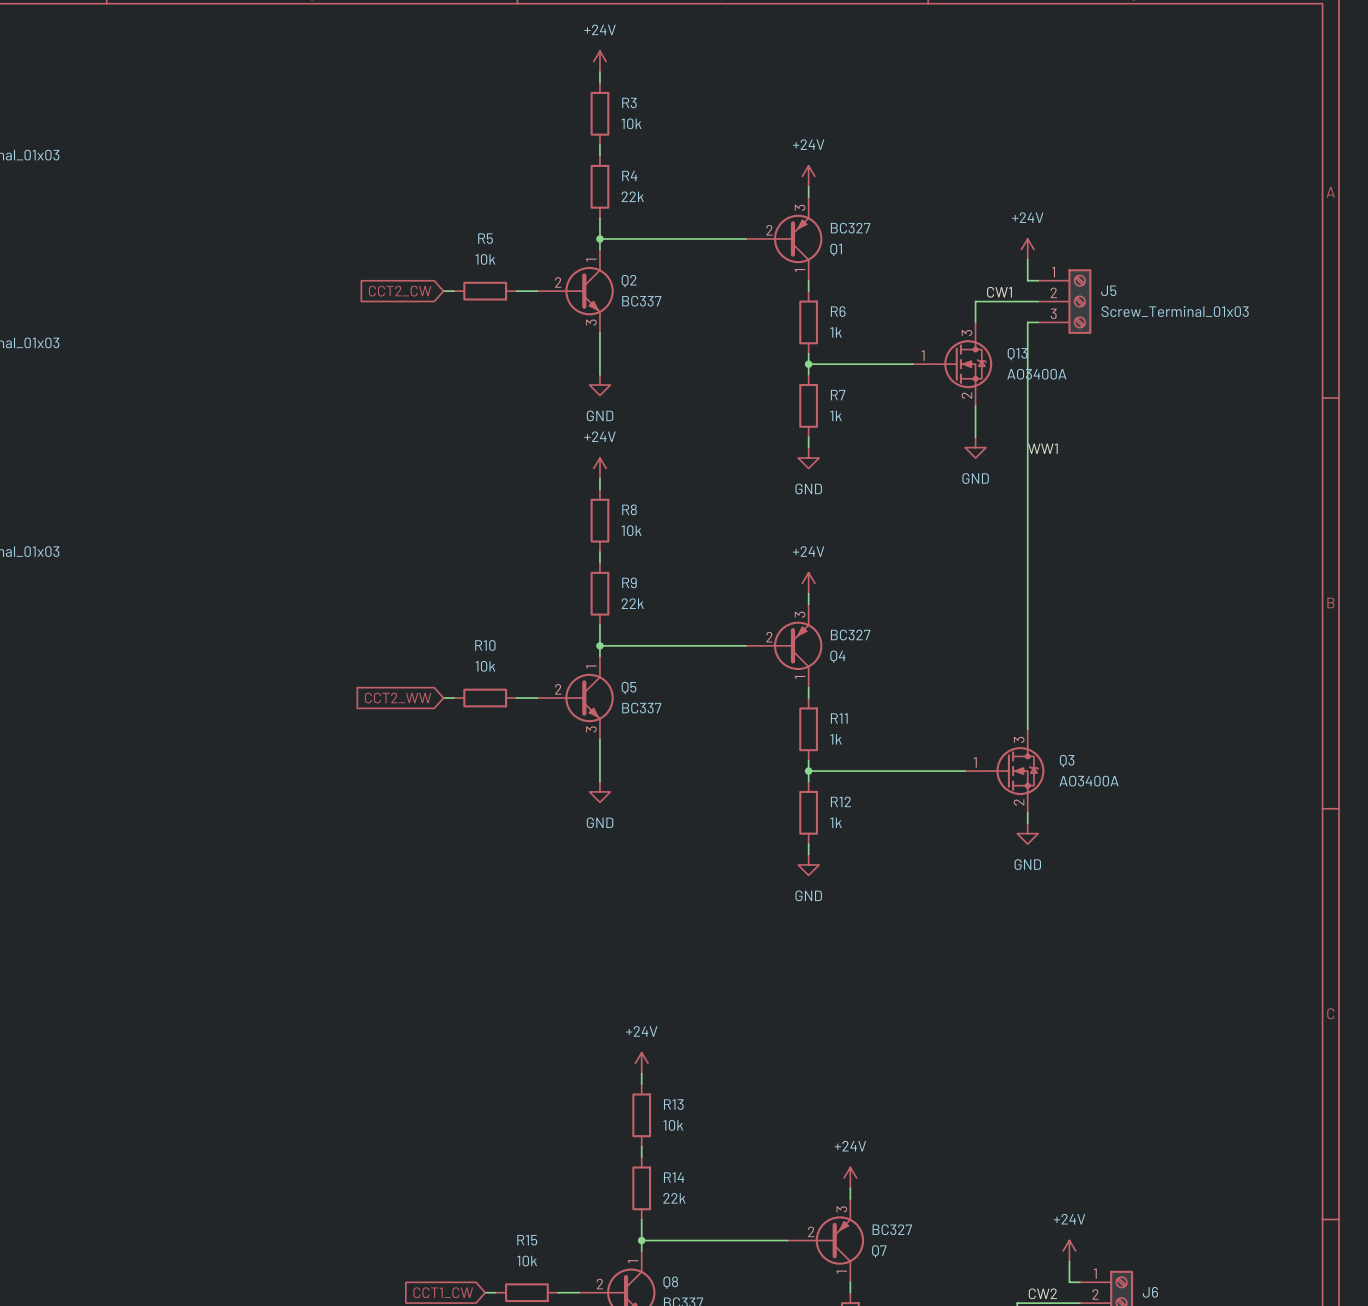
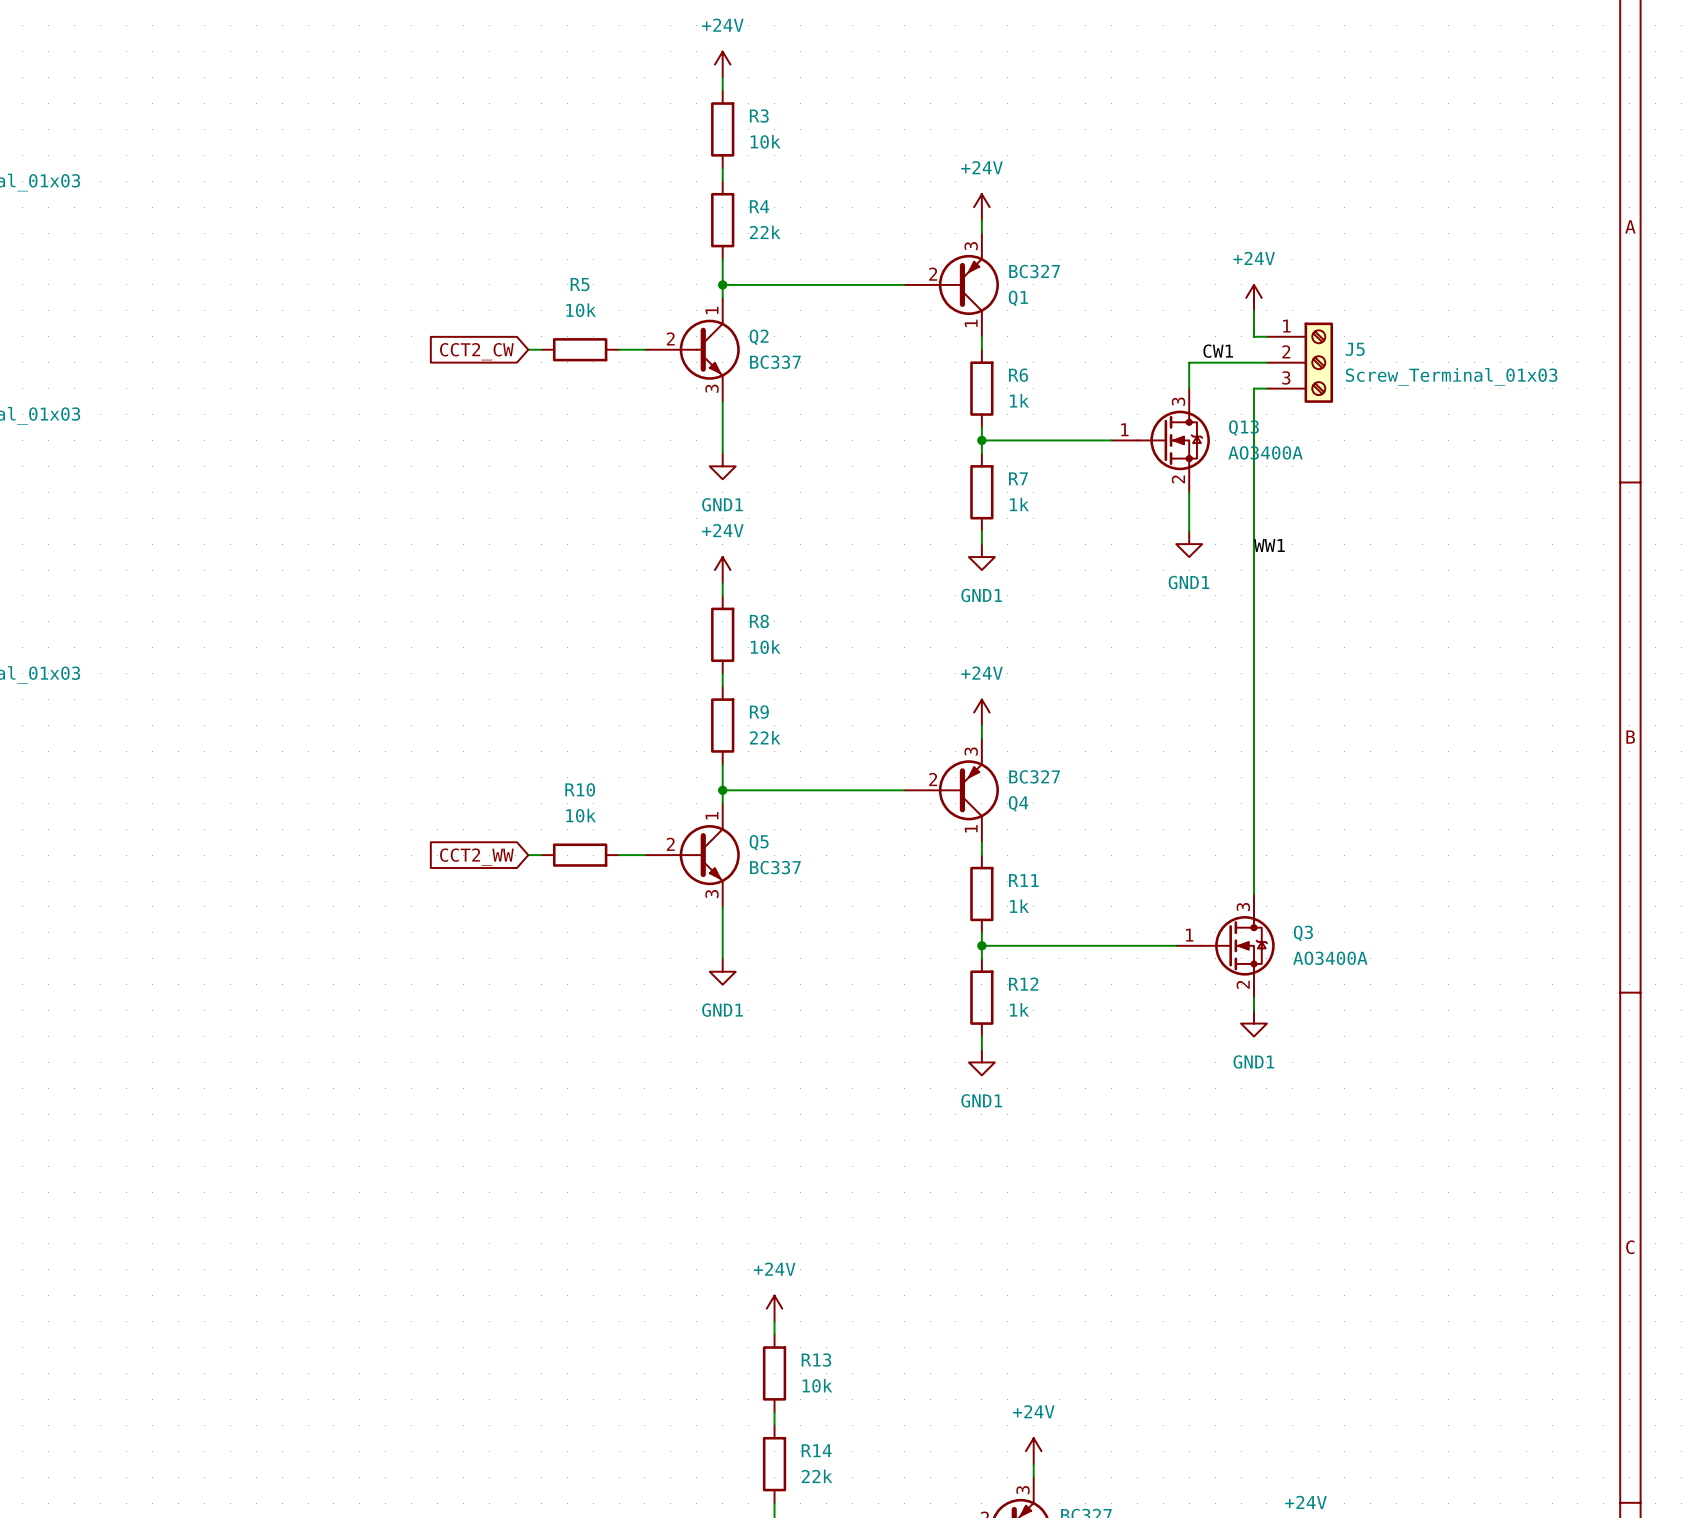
power symbol: GND (599, 385) -> GND1 (722, 466)
power symbol: GND (975, 447) -> GND1 (1189, 544)
power symbol: GND (808, 458) -> GND1 (981, 557)
power symbol: GND (599, 791) -> GND1 (722, 971)
power symbol: GND (1027, 833) -> GND1 (1253, 1023)
power symbol: GND (808, 864) -> GND1 (981, 1062)

